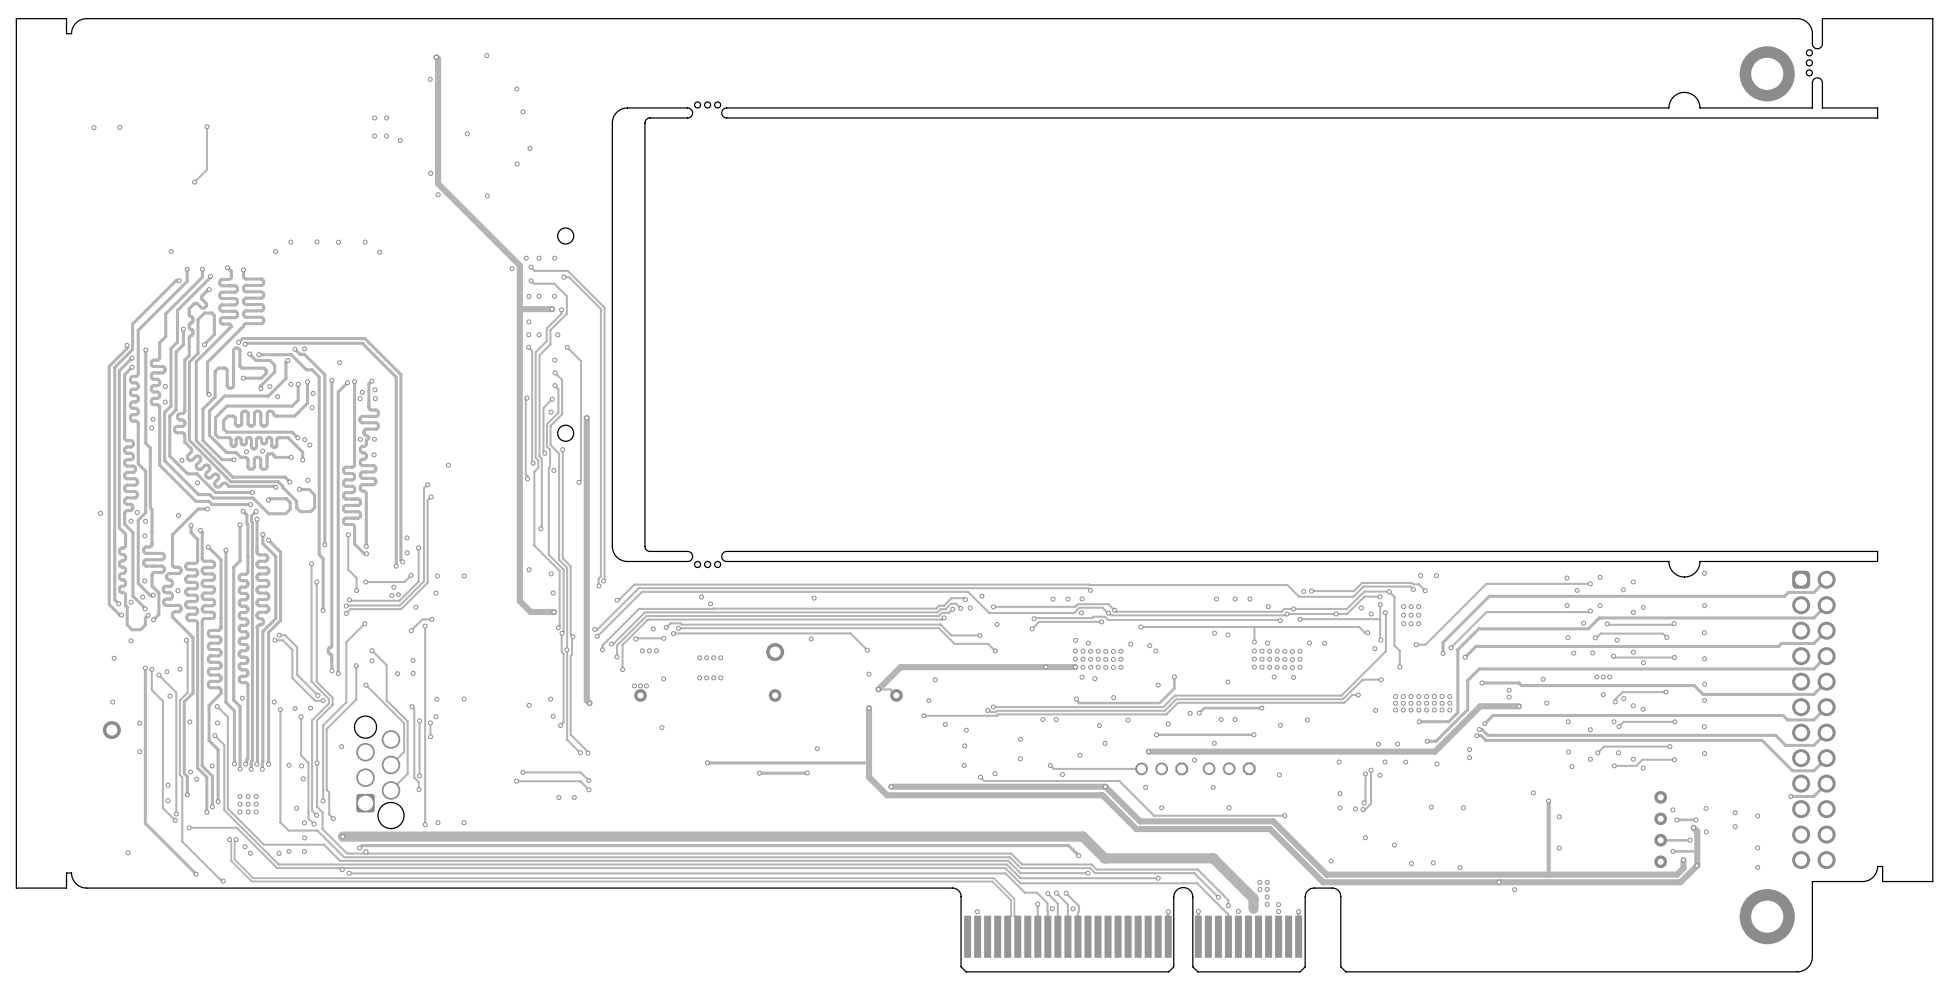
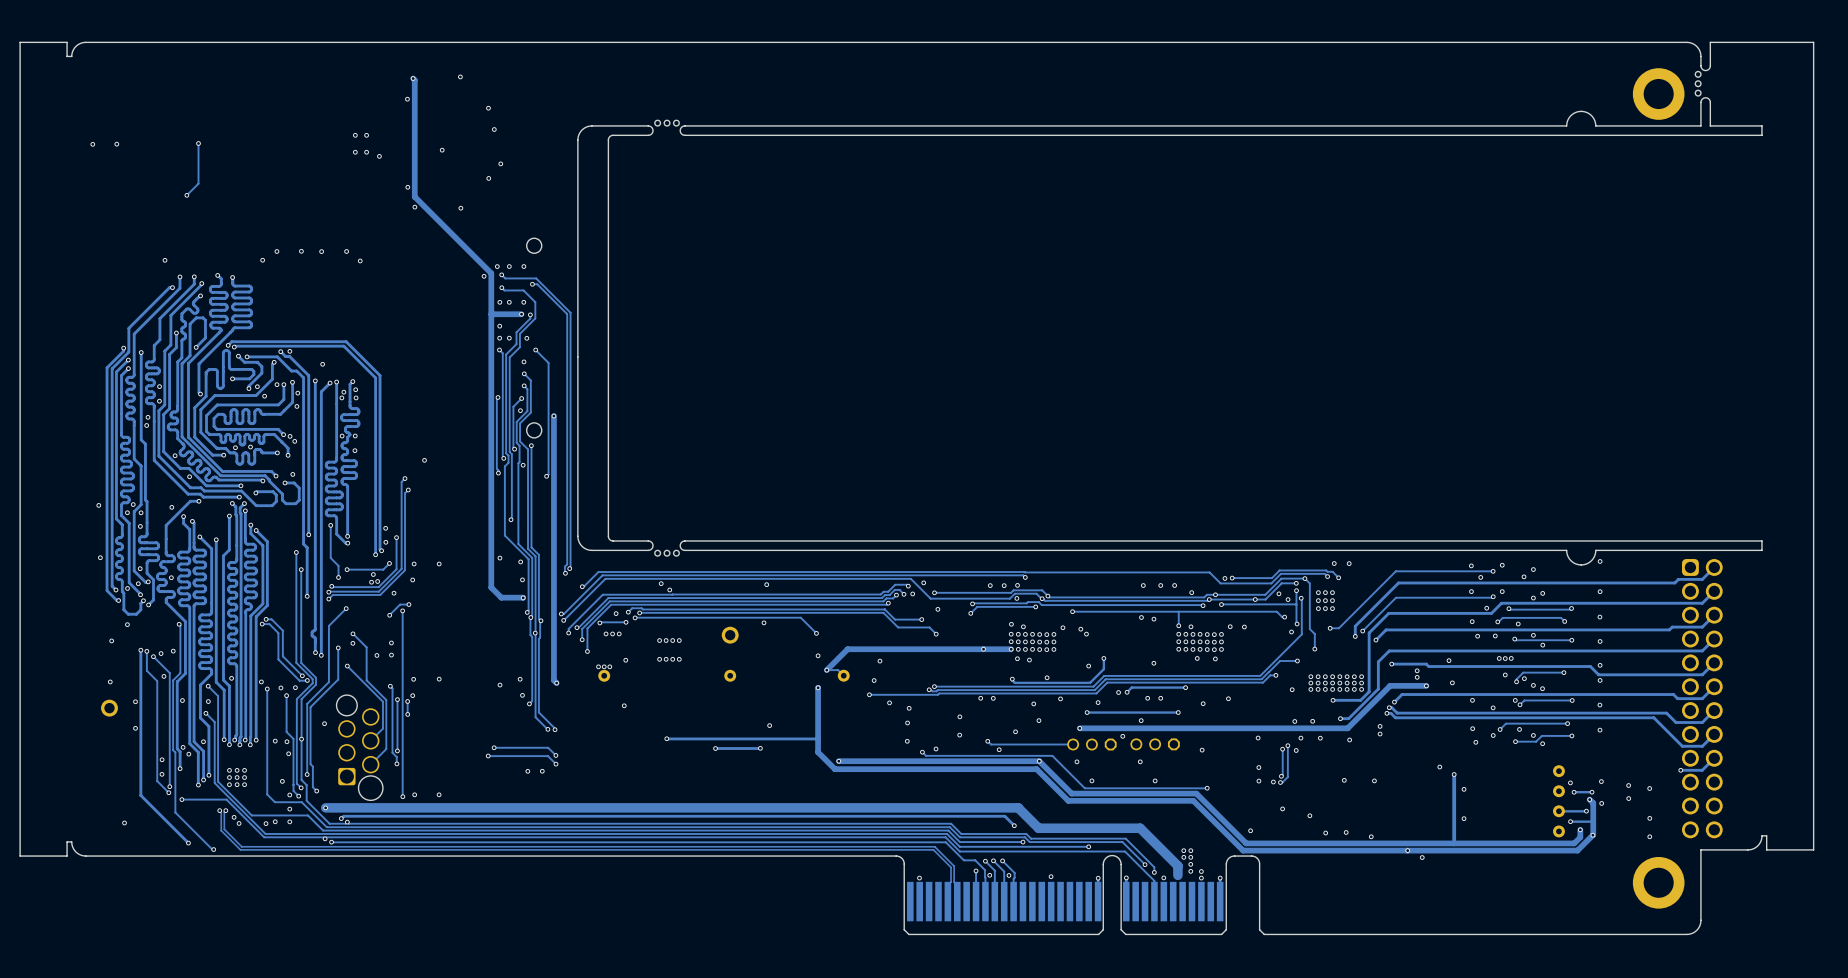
via: none -> (100, 557)
via: none -> (1051, 876)

